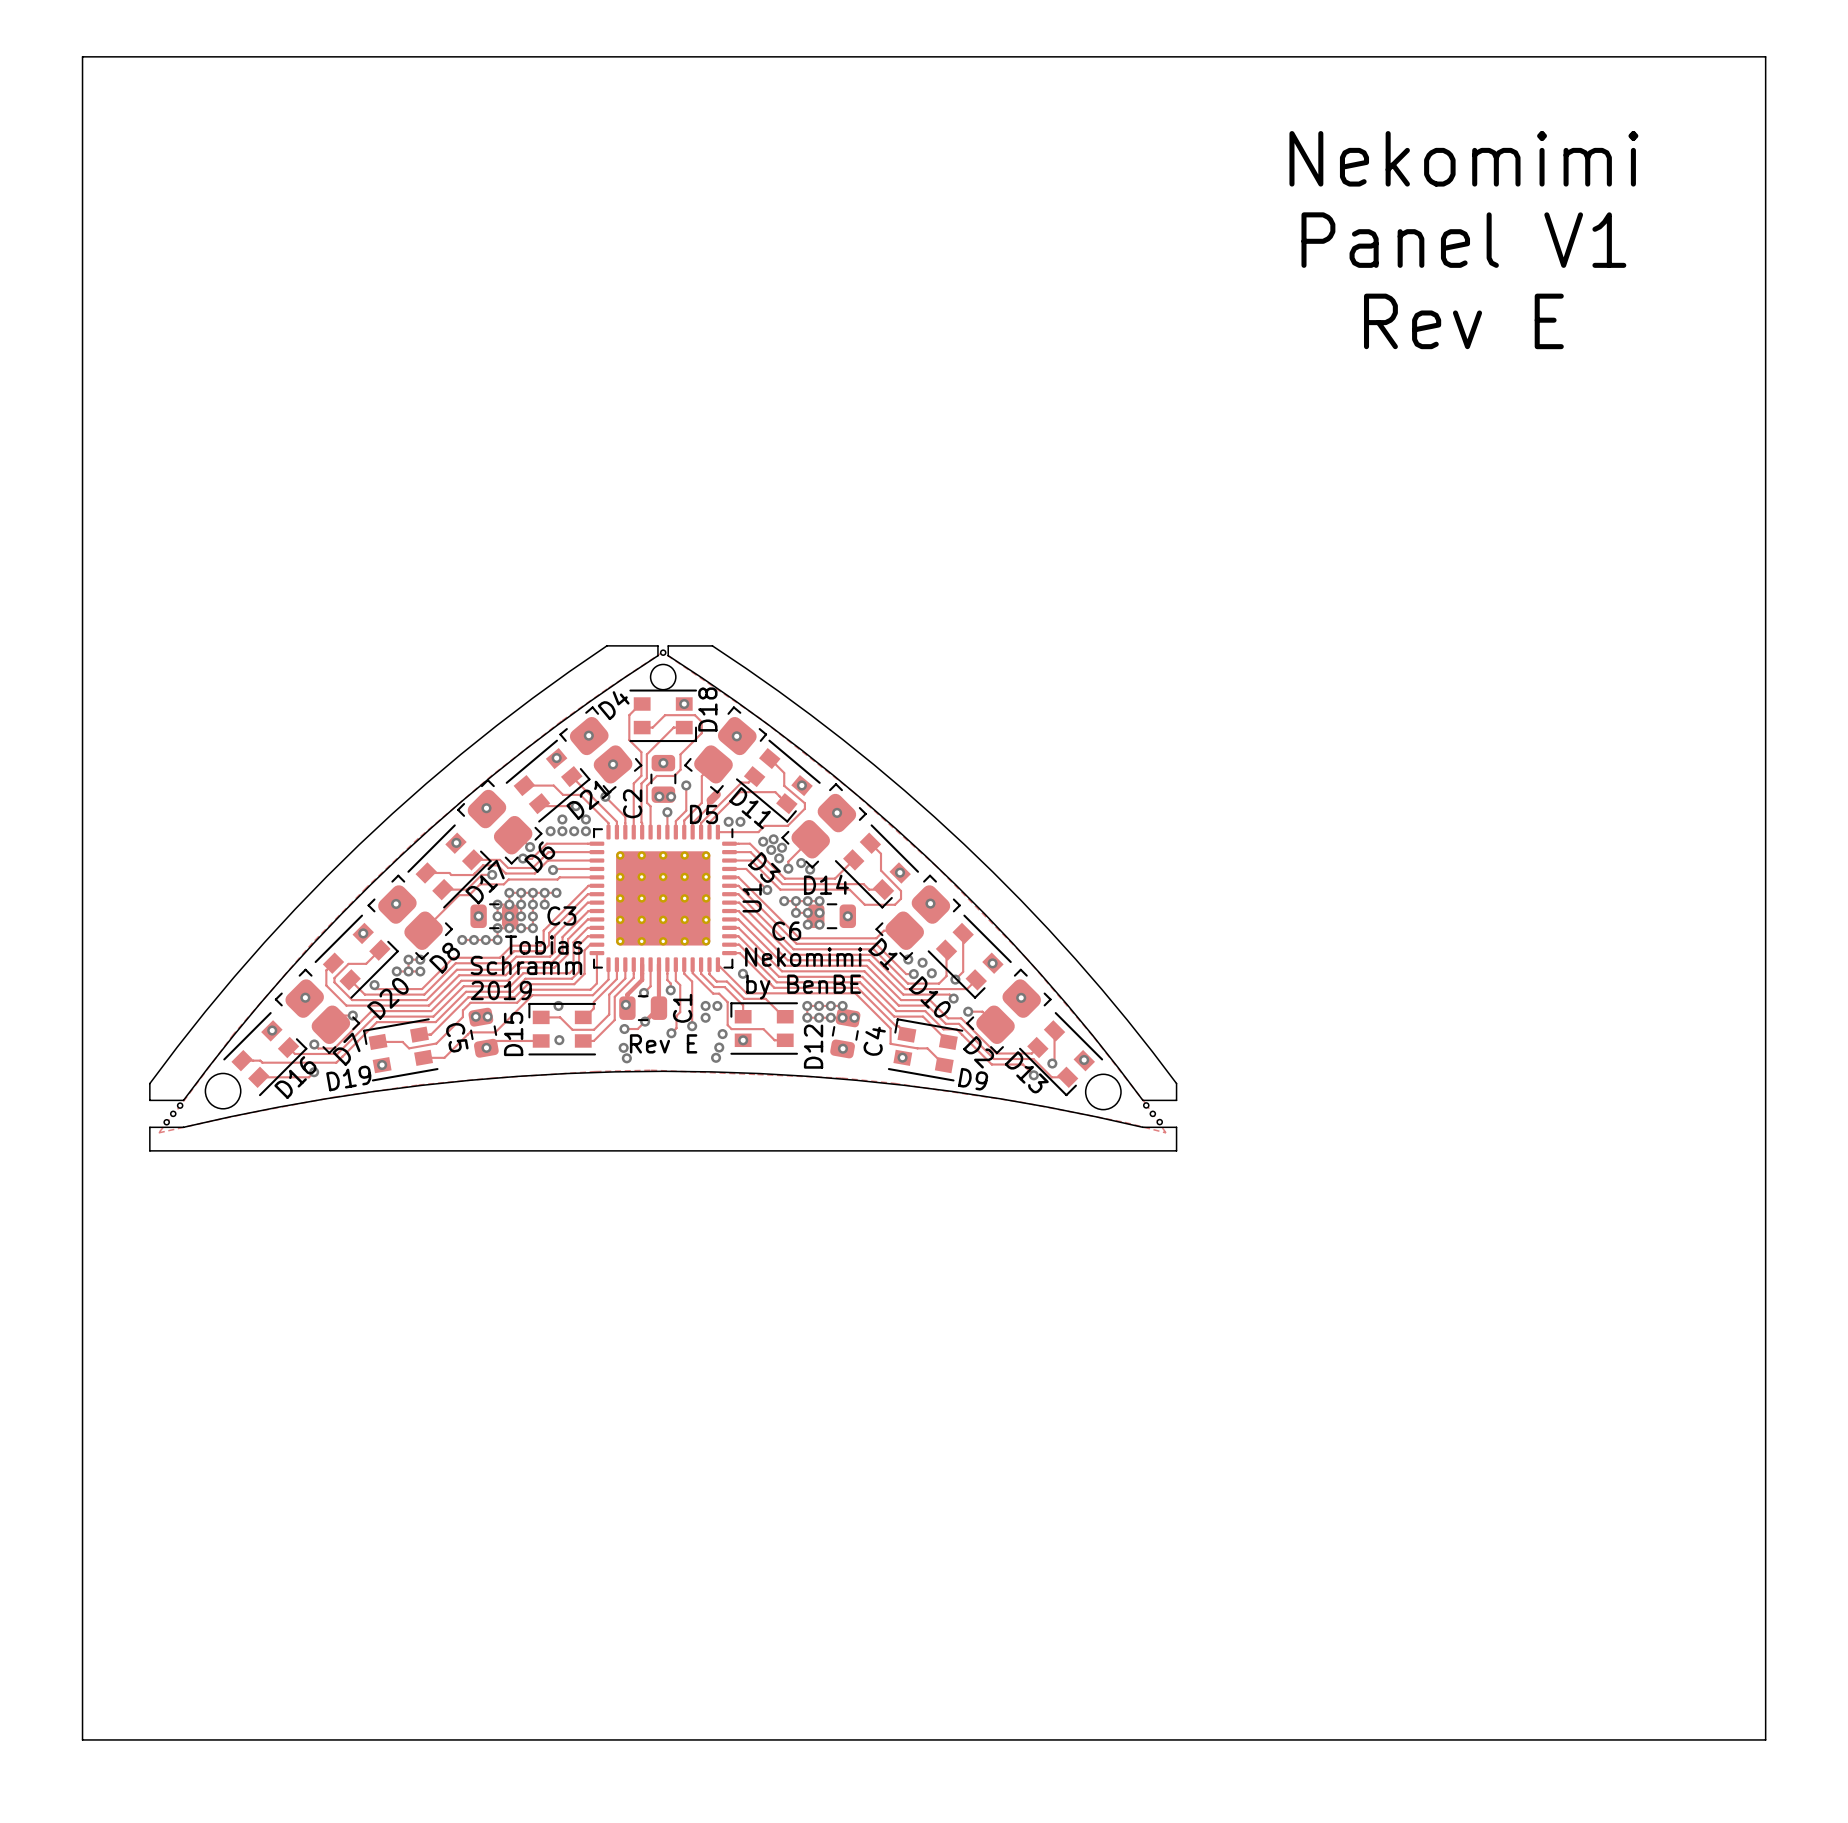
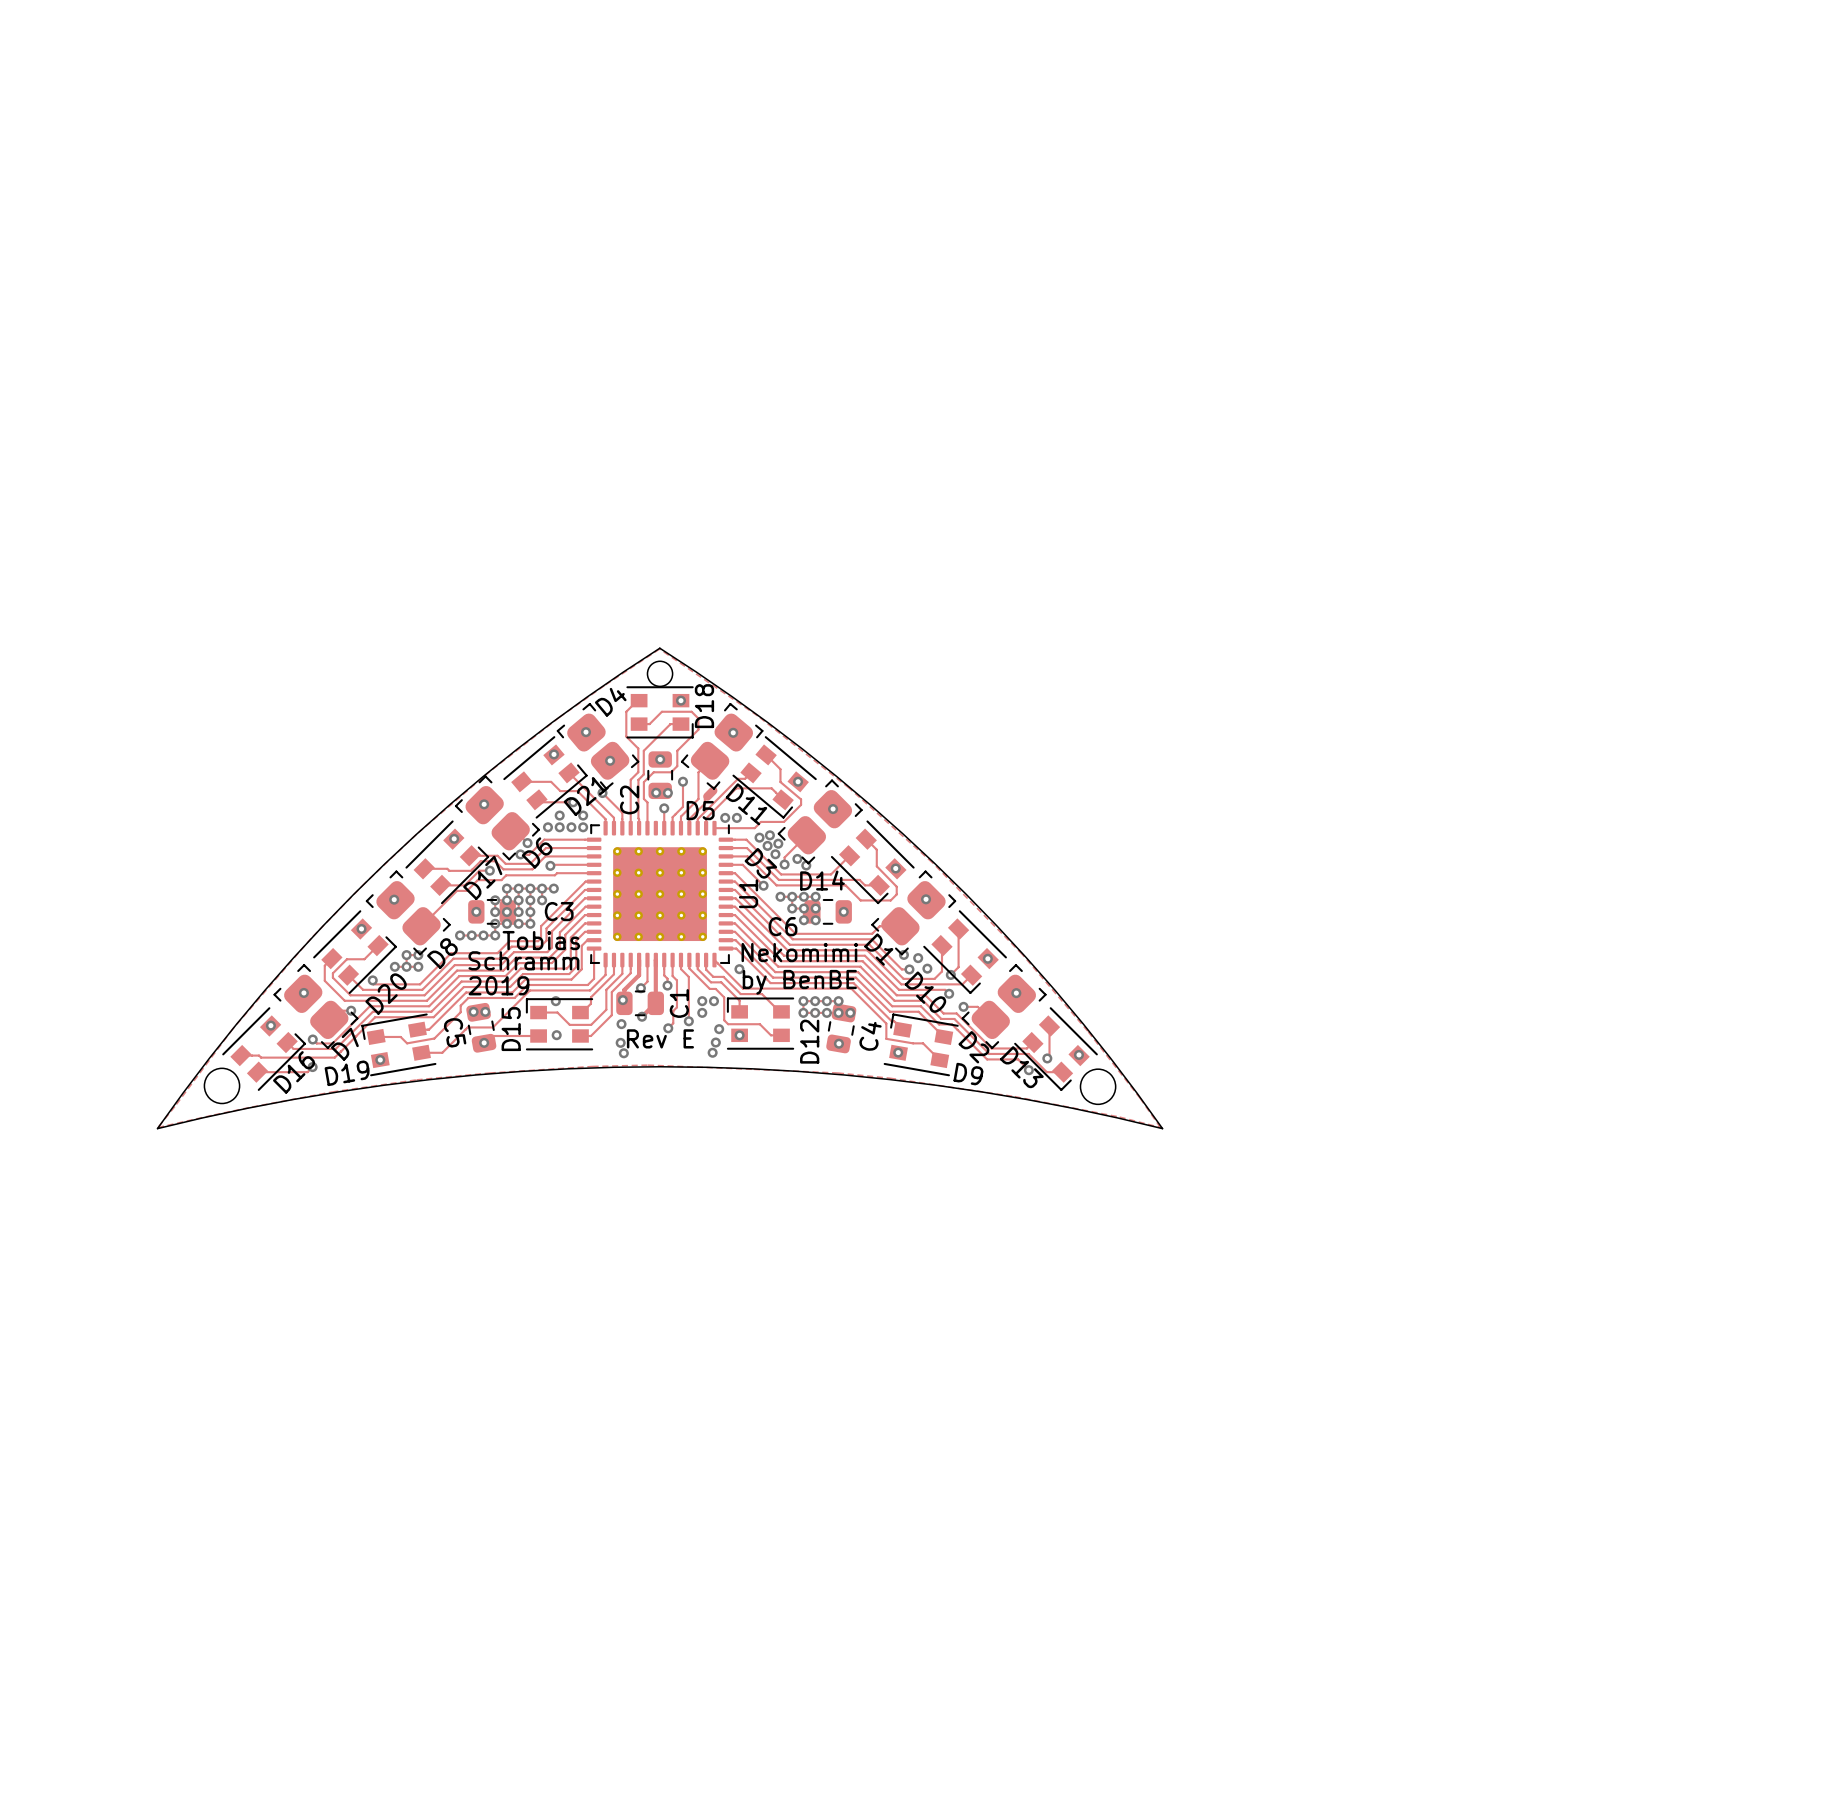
board edge: (82, 56) (82, 1739) (1765, 1739) (1765, 56) (82, 56) -> none
text: Nekomimi (1463, 158) -> none
text: Panel V1 (1463, 240) -> none
text: Rev E (1463, 321) -> none
board edge: (606, 645) (657, 645) (657, 655) (590, 701) (524, 750) (461, 801) (400, 856) (342, 913) (286, 973) (233, 1035) (183, 1100) (149, 1100) (149, 1083) (177, 1047) (264, 942) (326, 876) (392, 813) (461, 754) (532, 698) (606, 645) -> none
board edge: (668, 645) (712, 645) (778, 691) (842, 739) (934, 816) (1021, 900) (1101, 989) (1176, 1083) (1176, 1100) (1142, 1100) (1092, 1035) (1040, 973) (984, 913) (925, 856) (865, 801) (801, 750) (736, 701) (668, 655) (668, 645) -> none
board edge: none -> (659, 648) (587, 696) (517, 749) (449, 804) (385, 863) (323, 925) (264, 990) (209, 1058) (157, 1128) (292, 1099) (429, 1079) (567, 1068) (660, 1066) (752, 1068) (890, 1079) (1027, 1099) (1162, 1128) (1110, 1058) (1055, 990) (996, 925) (934, 863) (870, 804) (802, 749) (732, 696) (659, 648)
part: (663, 652) -> none
track: (645, 1021) (637, 1029) (624, 1029) -> none
part: (180, 1105) -> none
part: (1146, 1105) -> none
part: (173, 1113) -> none
part: (1152, 1113) -> none
part: (166, 1122) -> none
part: (1159, 1122) -> none
board edge: (149, 1127) (149, 1150) (1176, 1150) (1176, 1127) (1142, 1127) (1000, 1098) (904, 1085) (808, 1076) (711, 1071) (566, 1073) (469, 1080) (325, 1098) (183, 1127) (149, 1127) -> none

